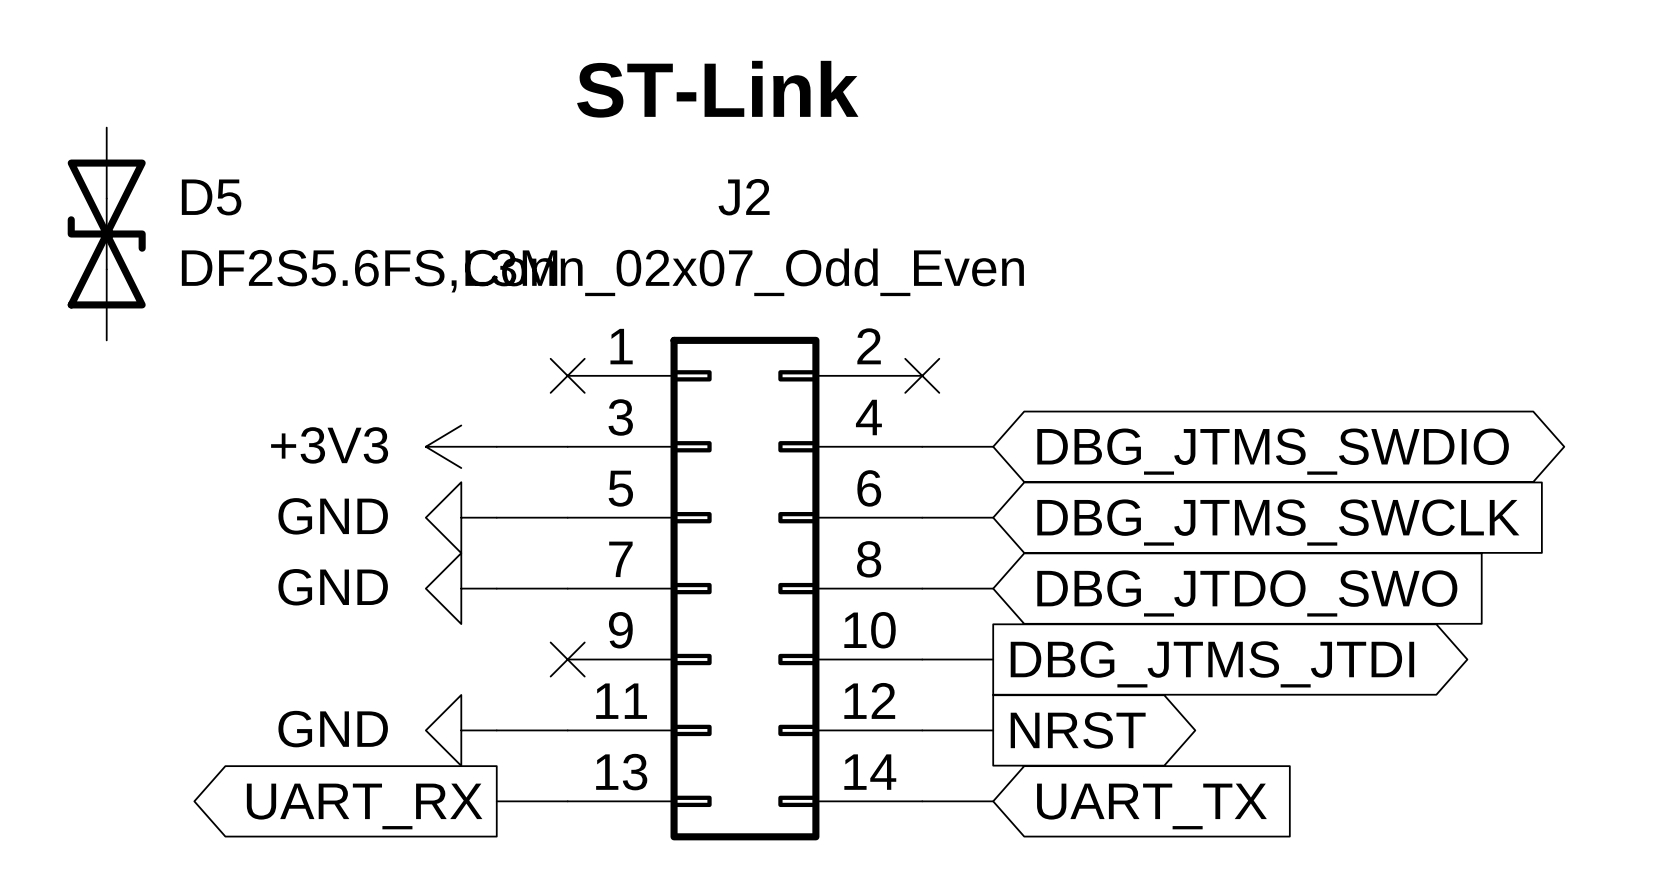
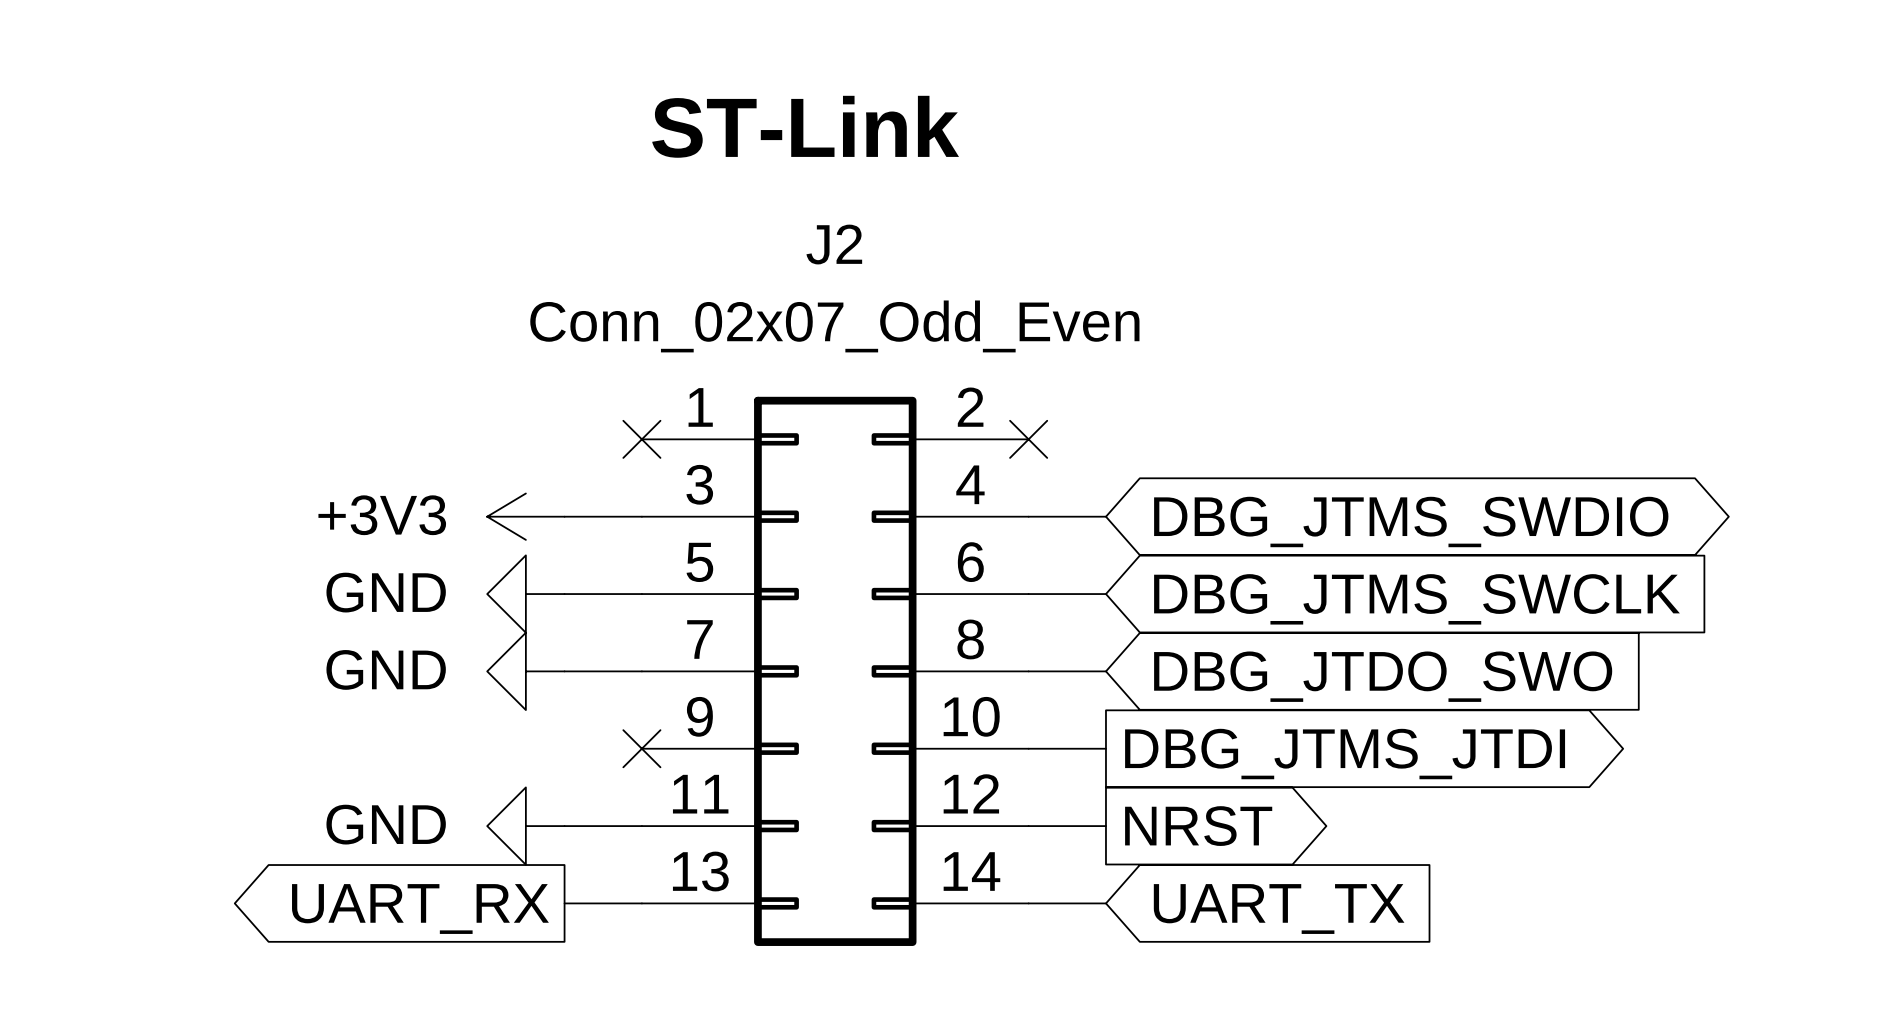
D5: DF2S5.6FS,L3M (106, 234) -> none

